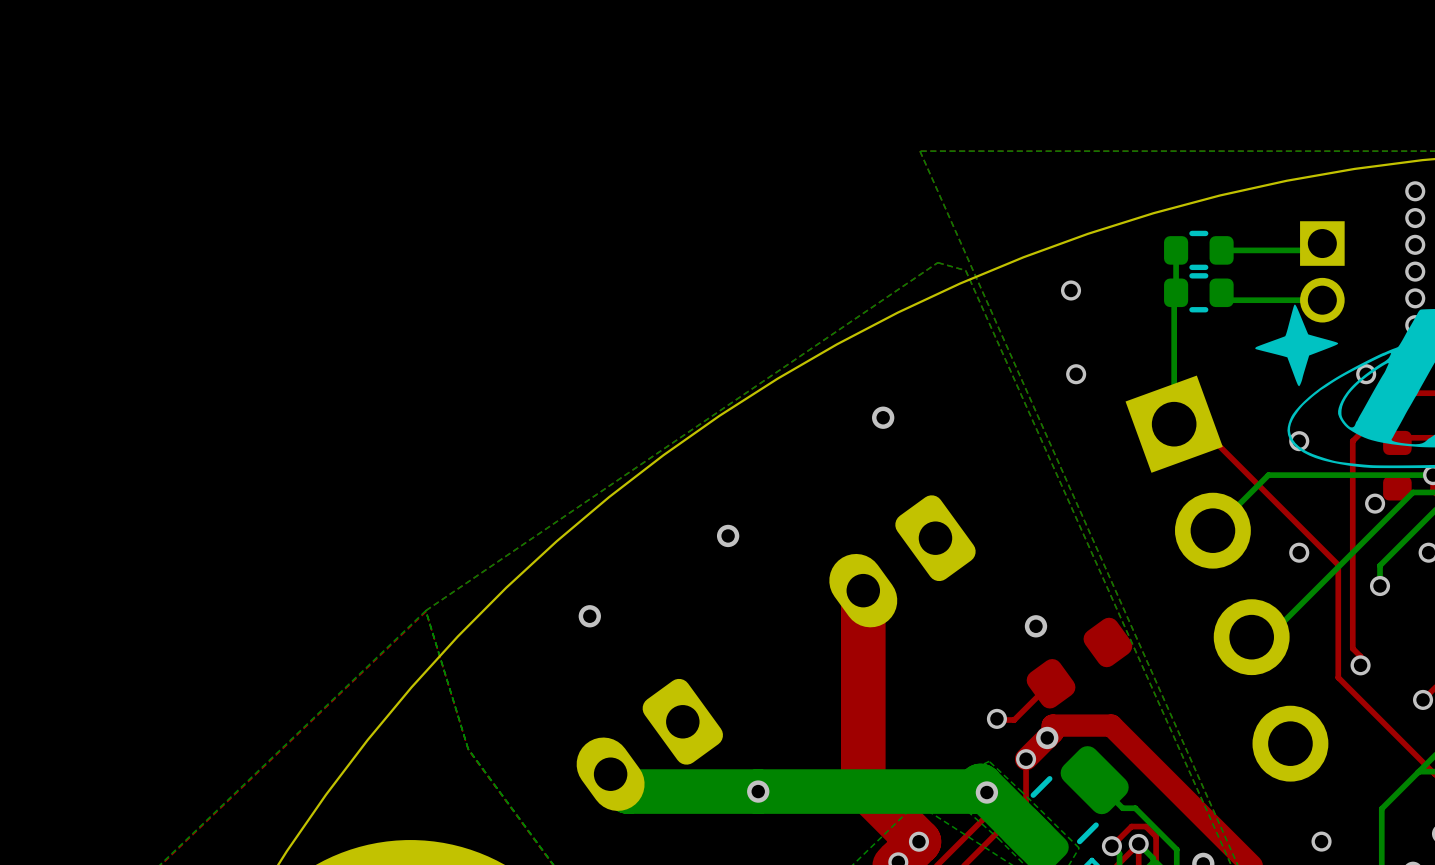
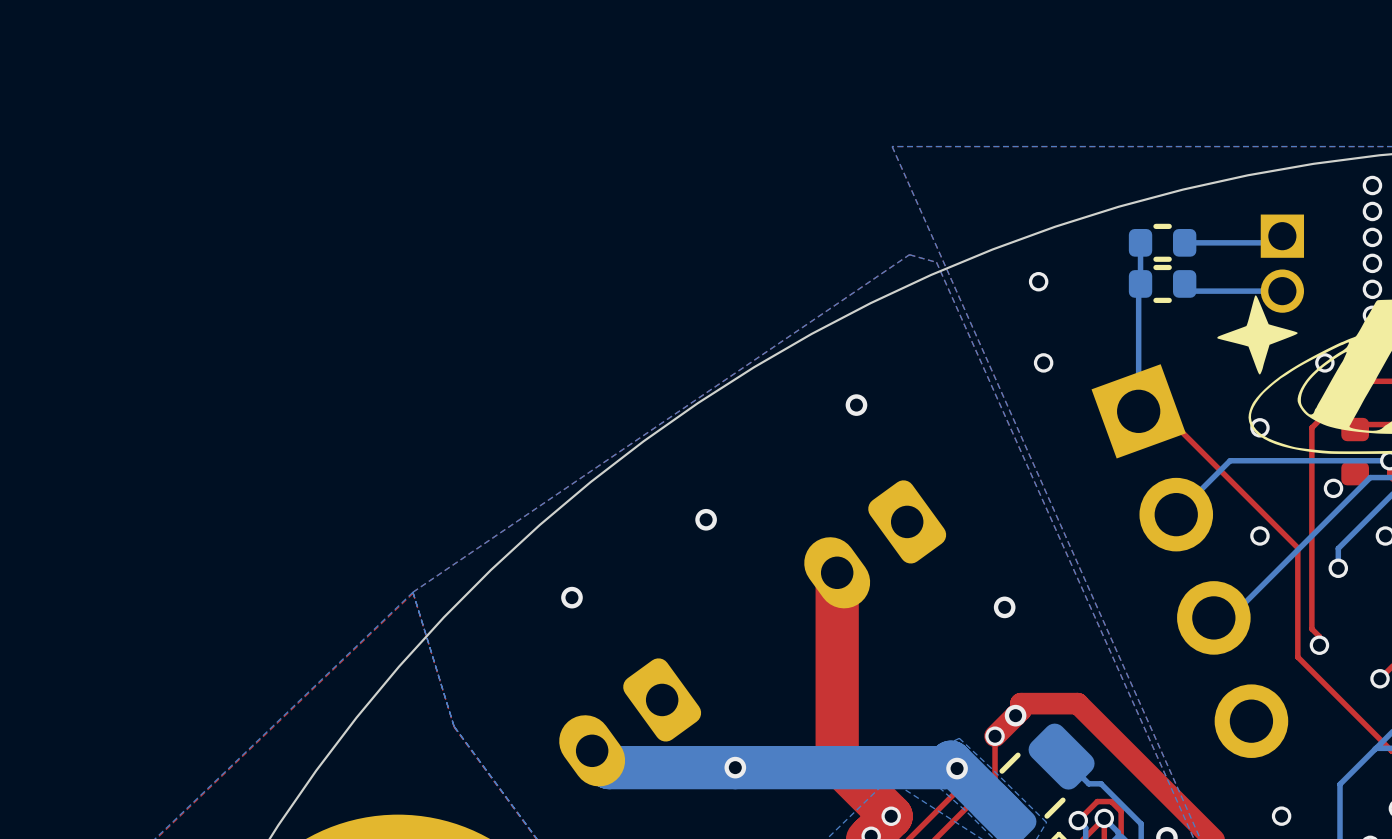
part: (1079, 663) -> none
top track: (1050, 683) (1014, 720) (996, 720) -> none
via: (996, 718) -> none

